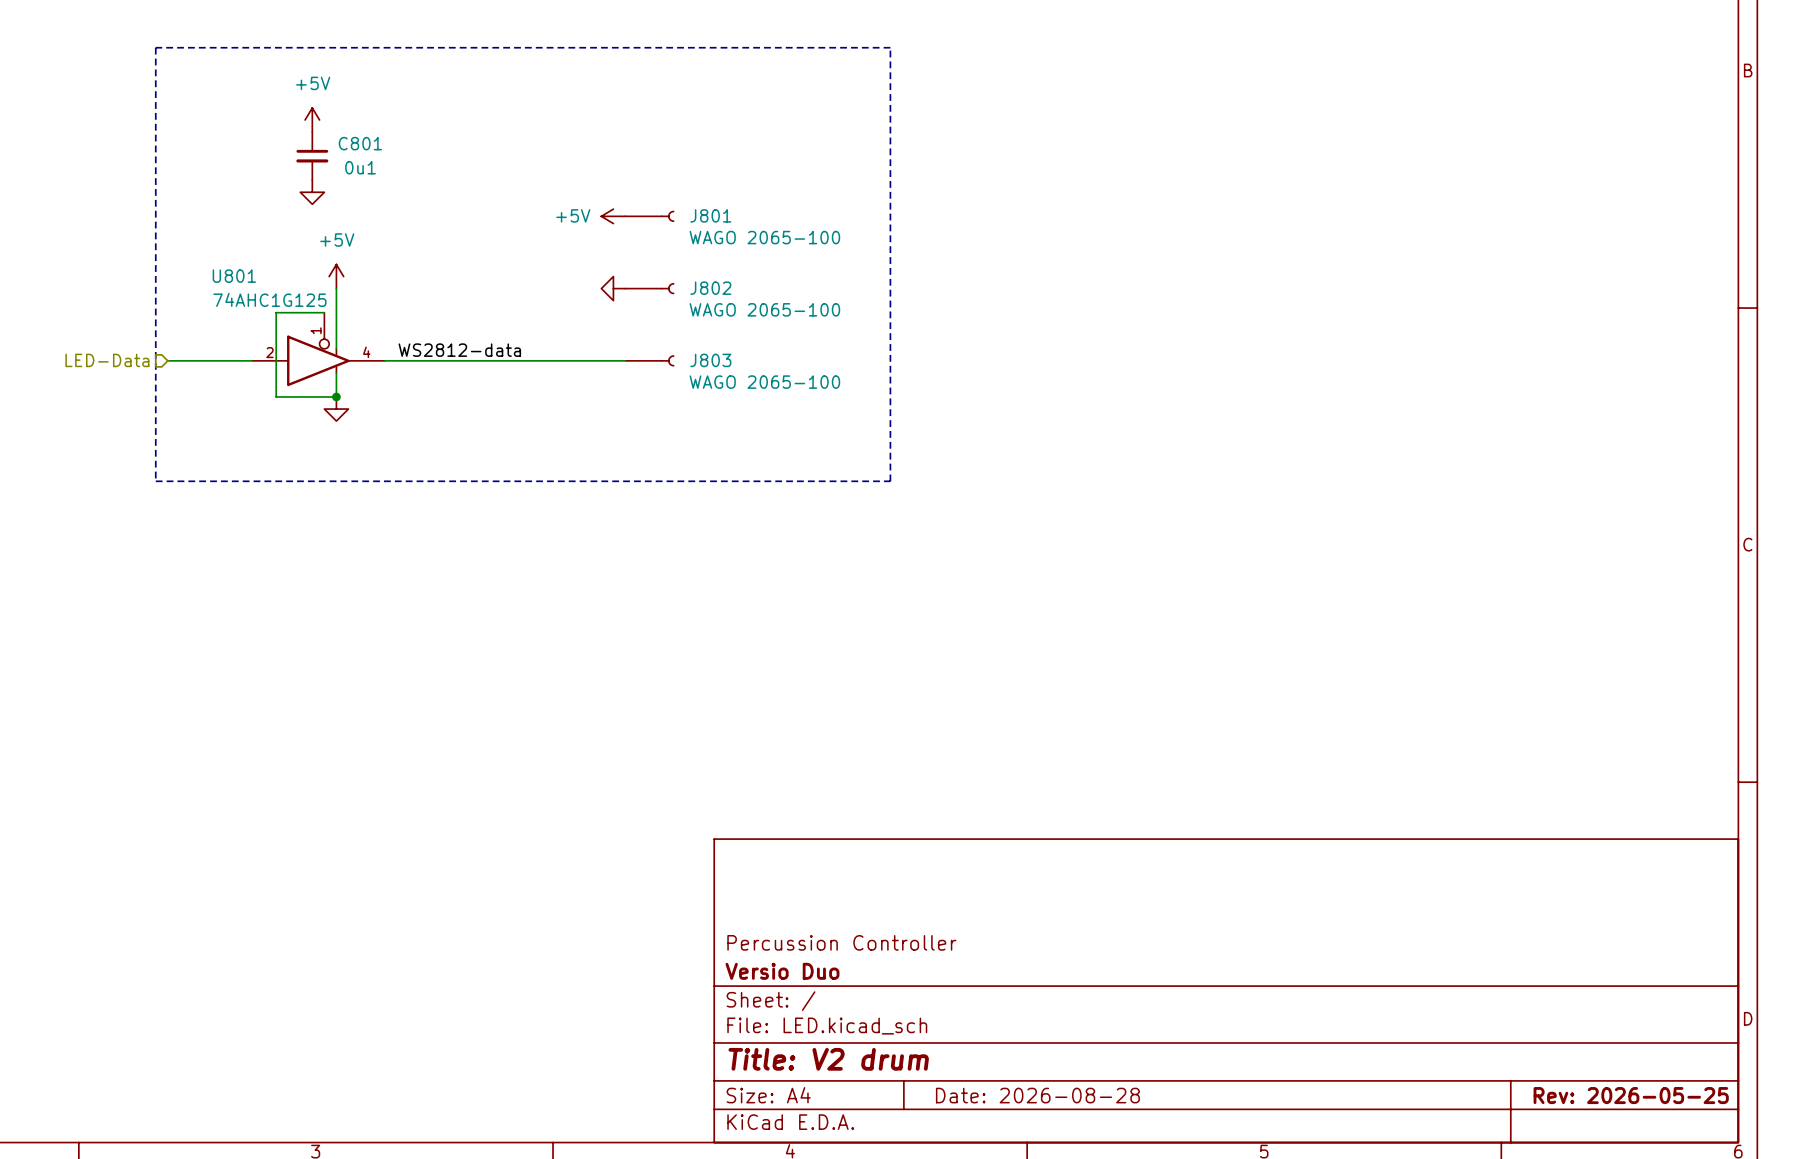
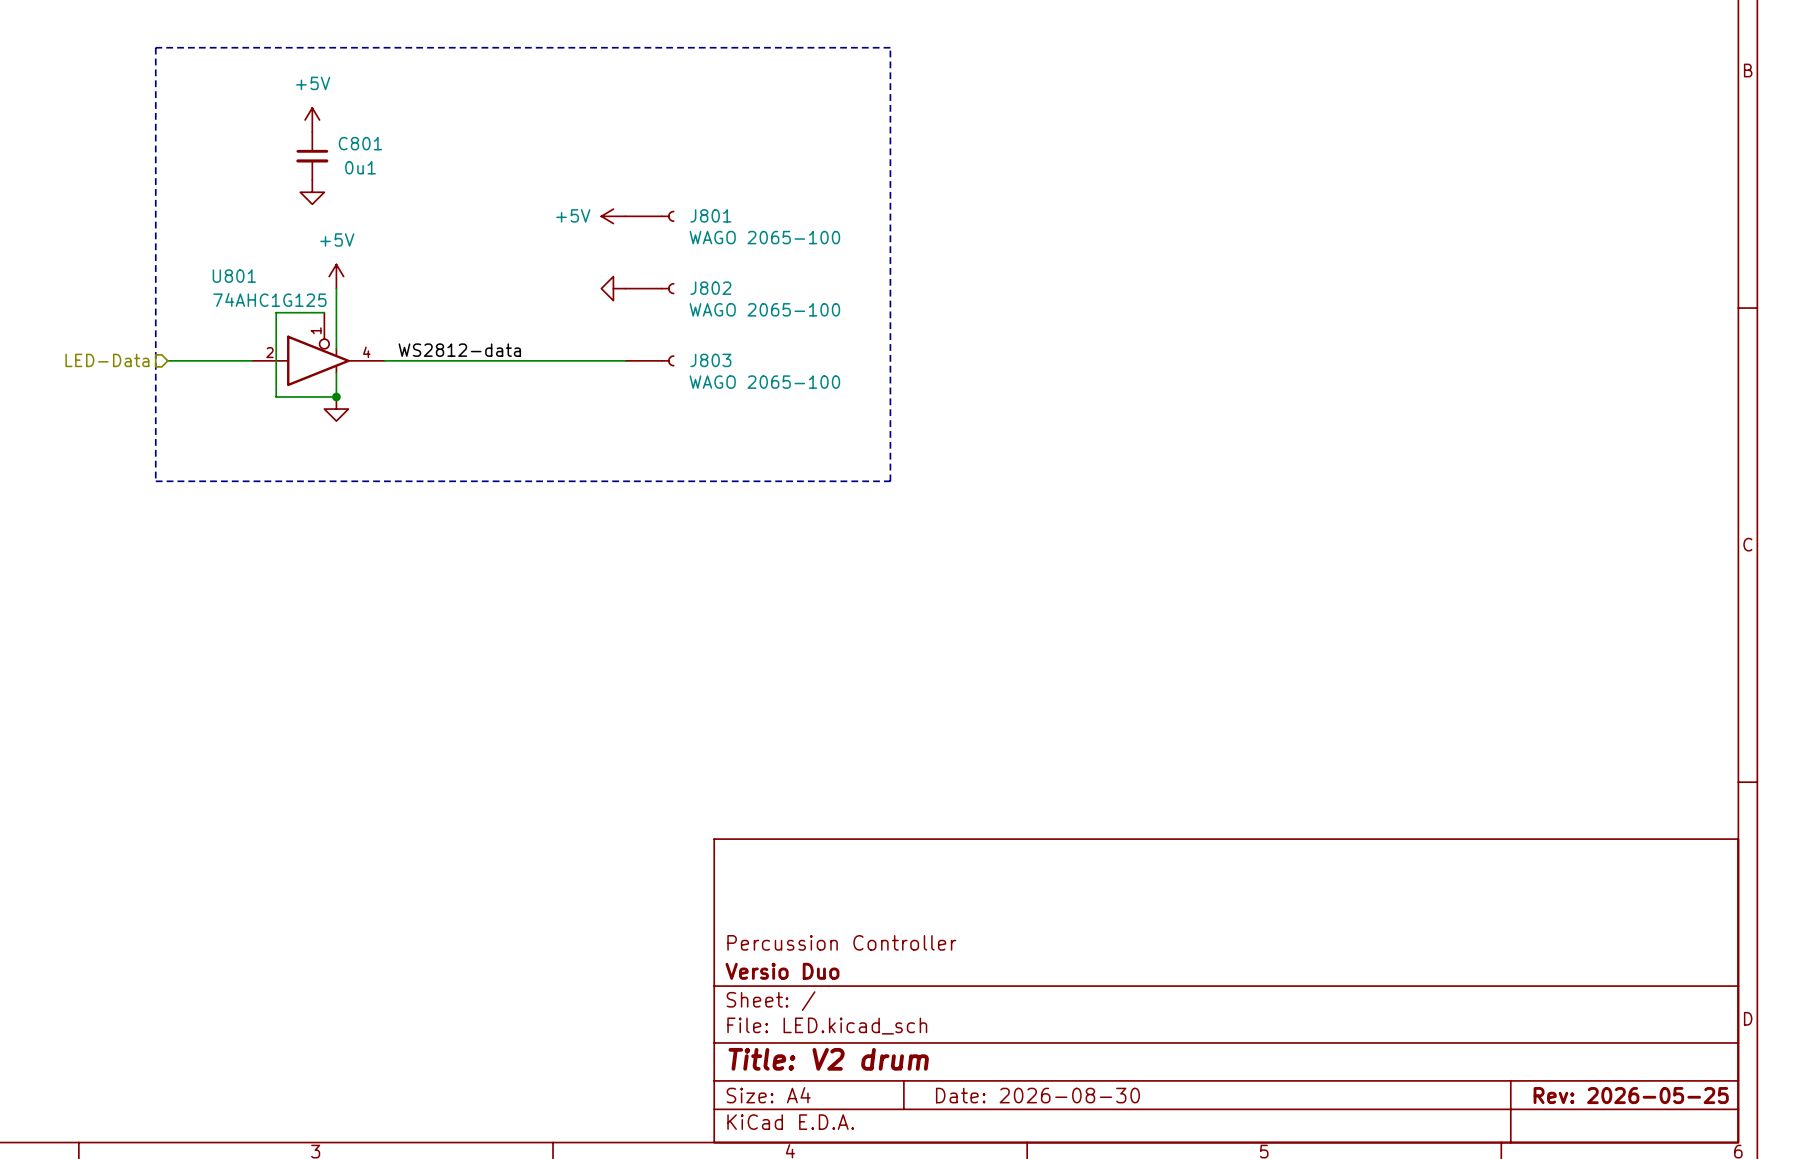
title block: Date: 2026-08-28 (1037, 1095) -> Date: 2026-08-30 (1037, 1095)

